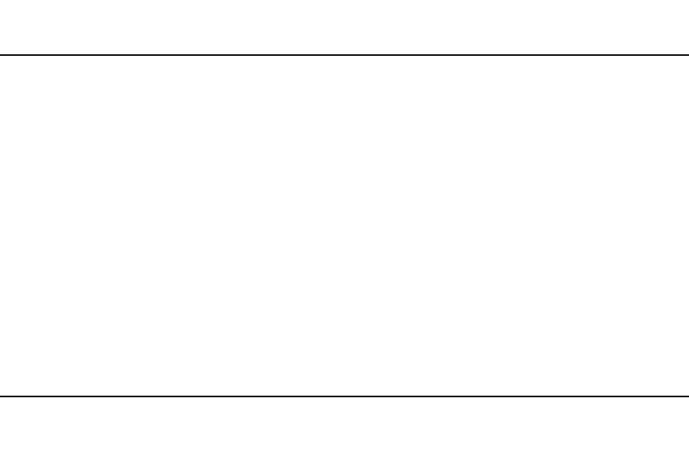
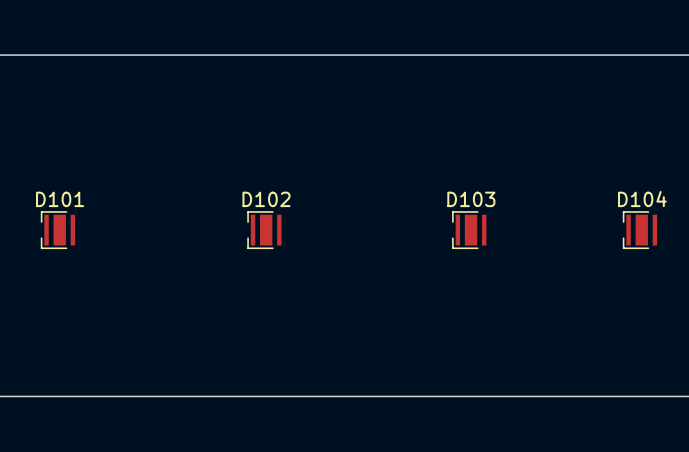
D101: none -> (57, 230)
D102: none -> (264, 230)
D103: none -> (469, 230)
D104: none -> (639, 230)

